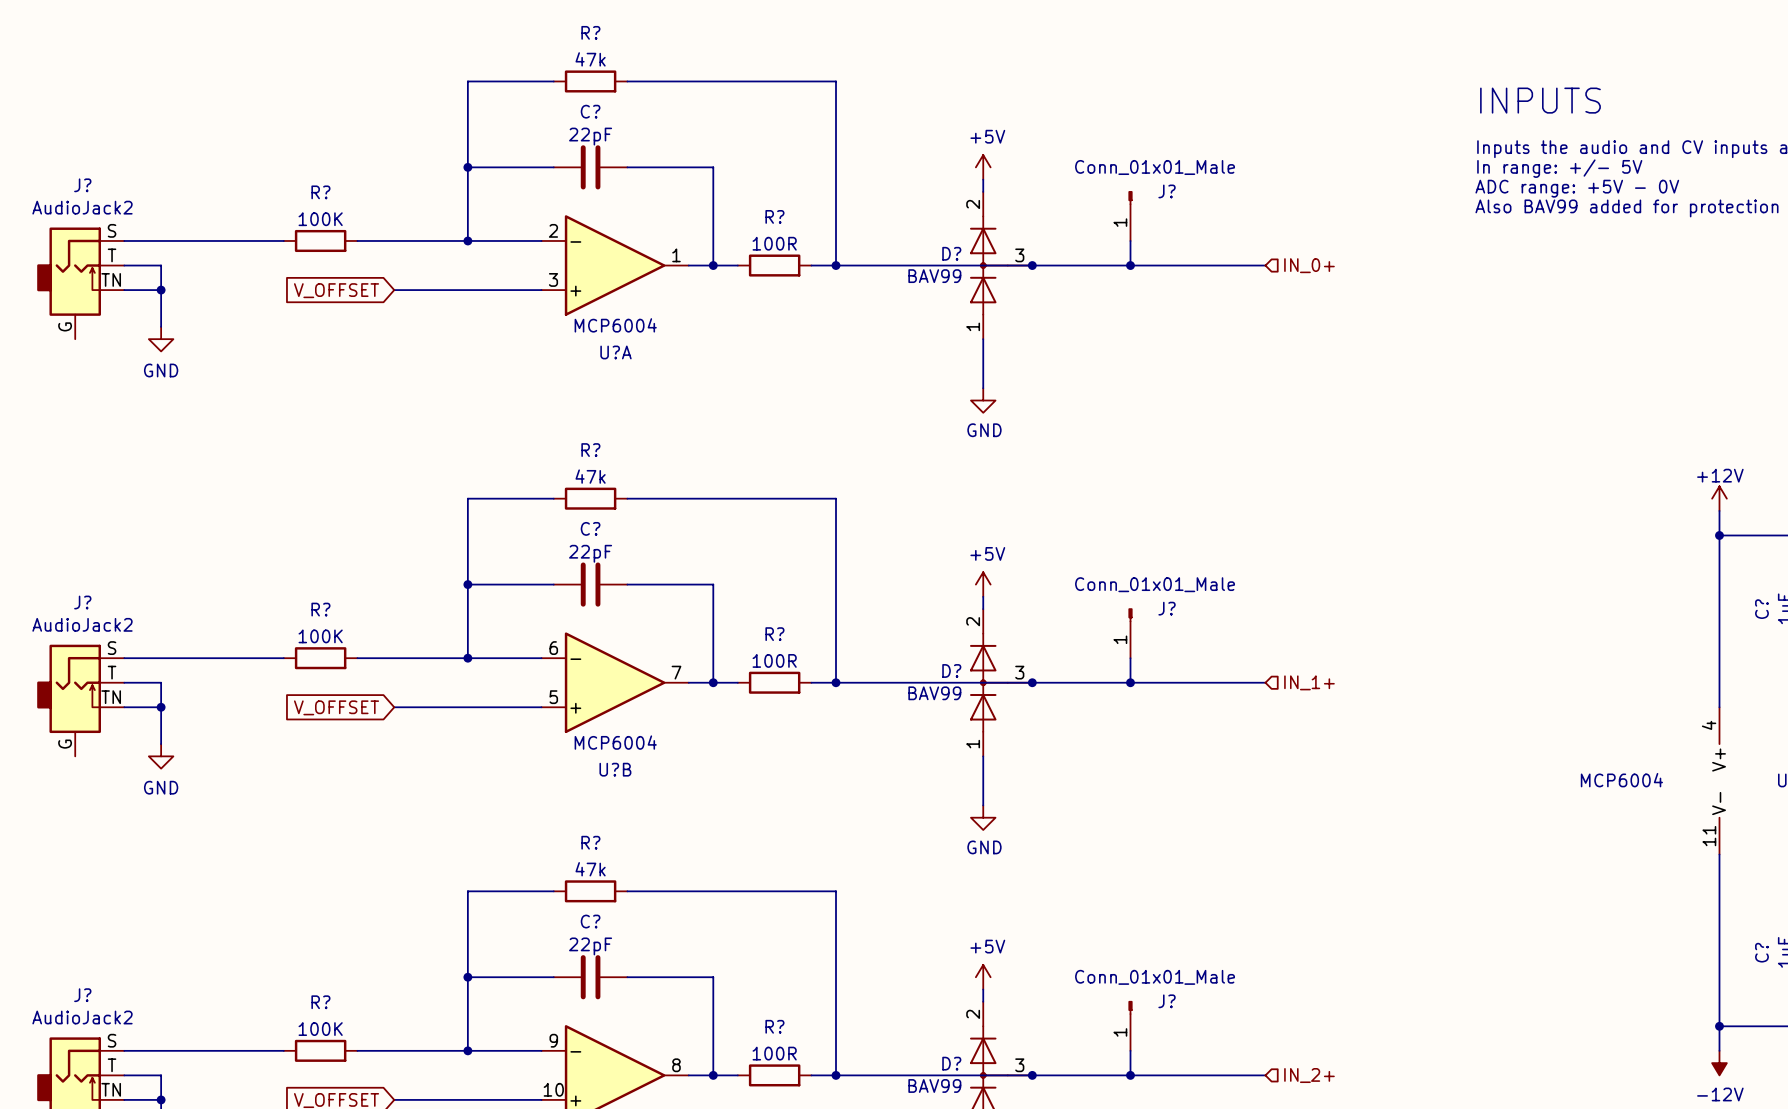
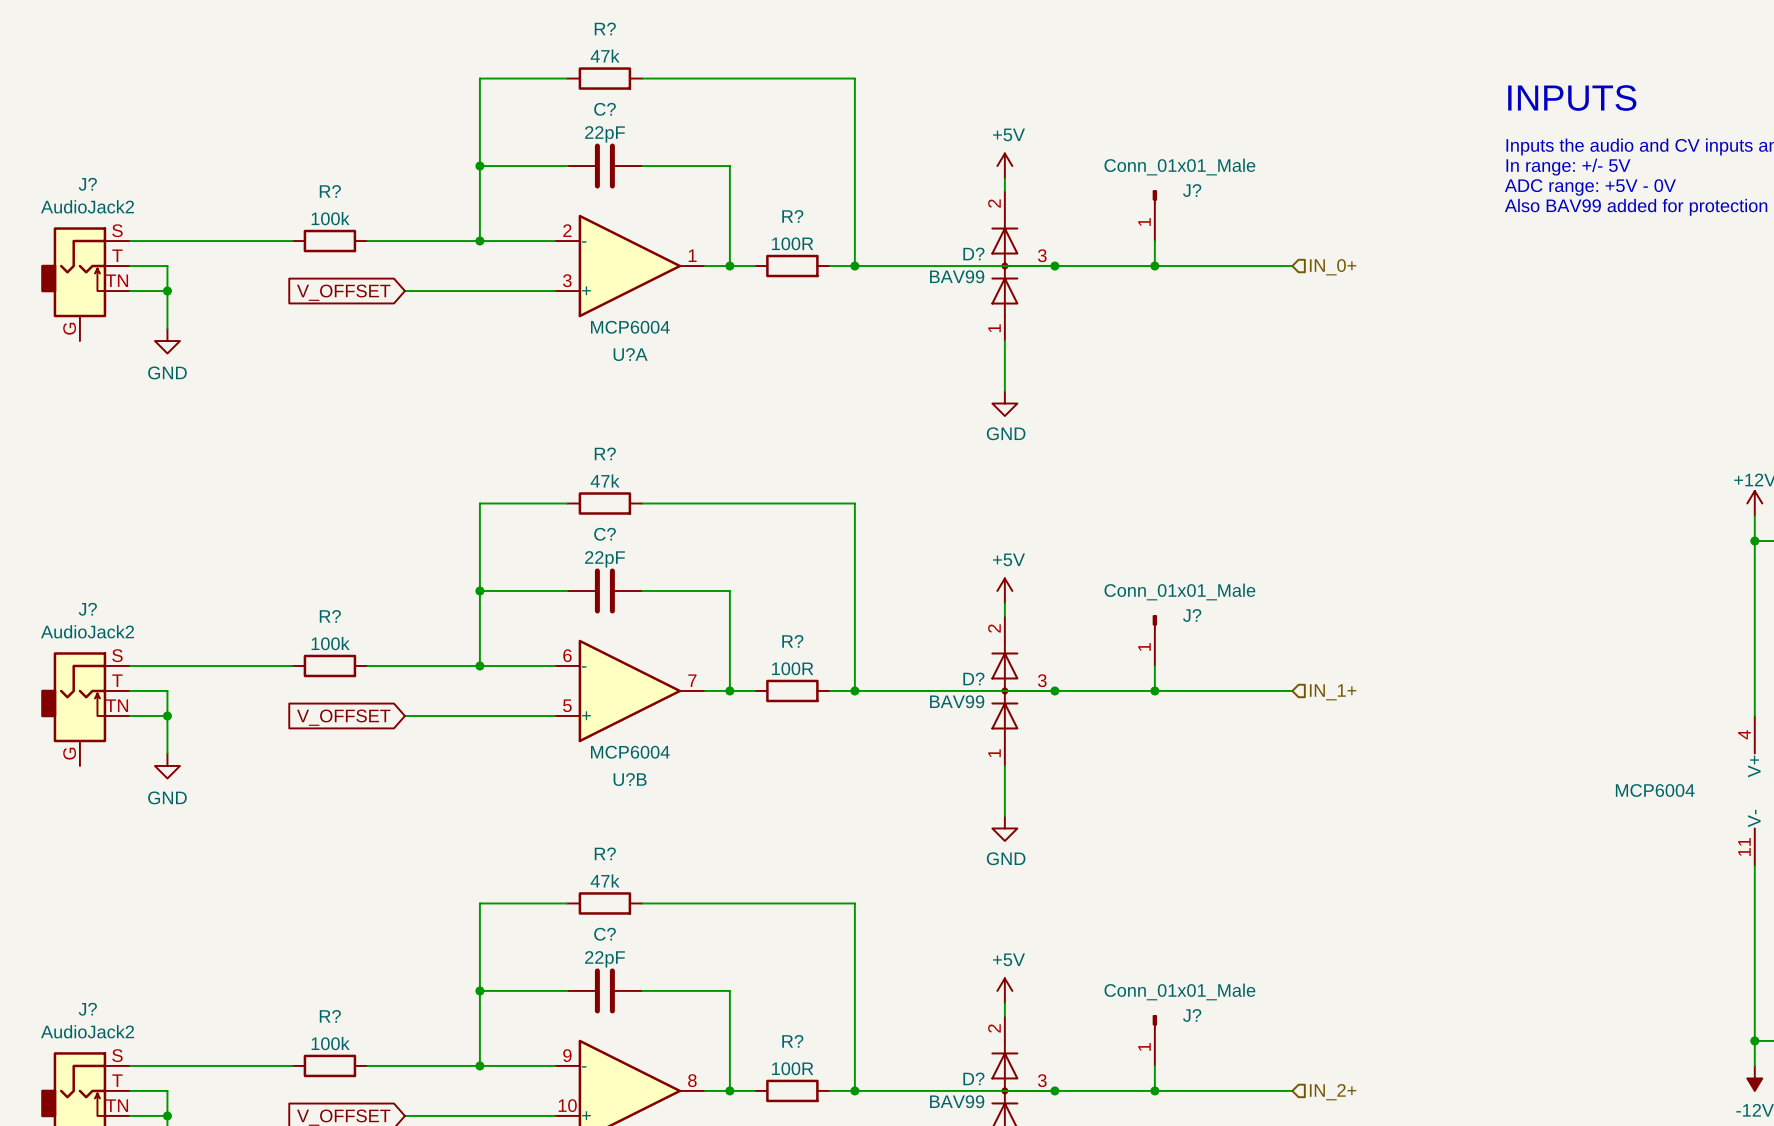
R? value: 100K (320, 219) -> 100k (330, 218)
R? value: 100K (320, 636) -> 100k (330, 643)
R? value: 100K (320, 1029) -> 100k (330, 1043)

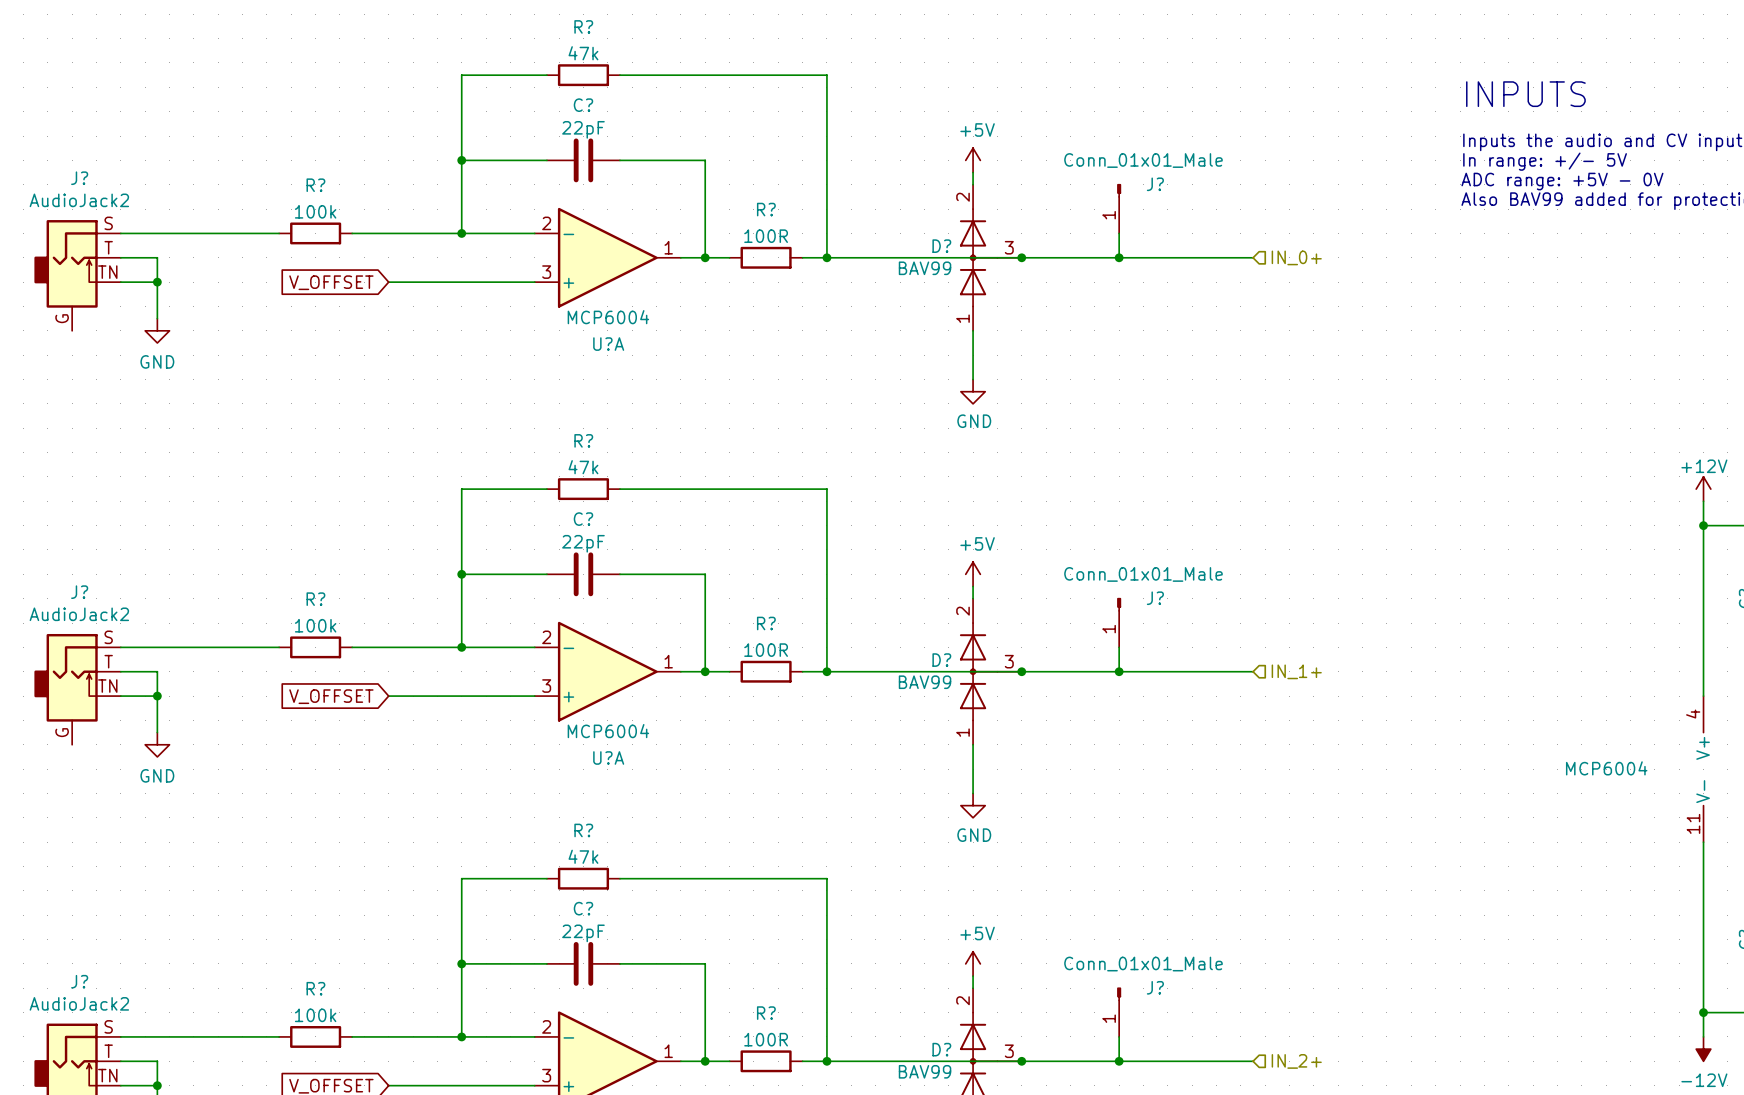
U?B pin number: 6 (567, 655) -> 2 (546, 637)
U?B pin number: 7 (692, 680) -> 1 (668, 661)
U?B pin number: 5 (567, 705) -> 3 (546, 686)
U?B name: U?B (630, 779) -> U?A (608, 757)
part pin number: 9 (567, 1055) -> 2 (546, 1026)
part pin number: 8 (692, 1080) -> 1 (668, 1051)
part pin number: 10 (567, 1105) -> 3 (546, 1075)

